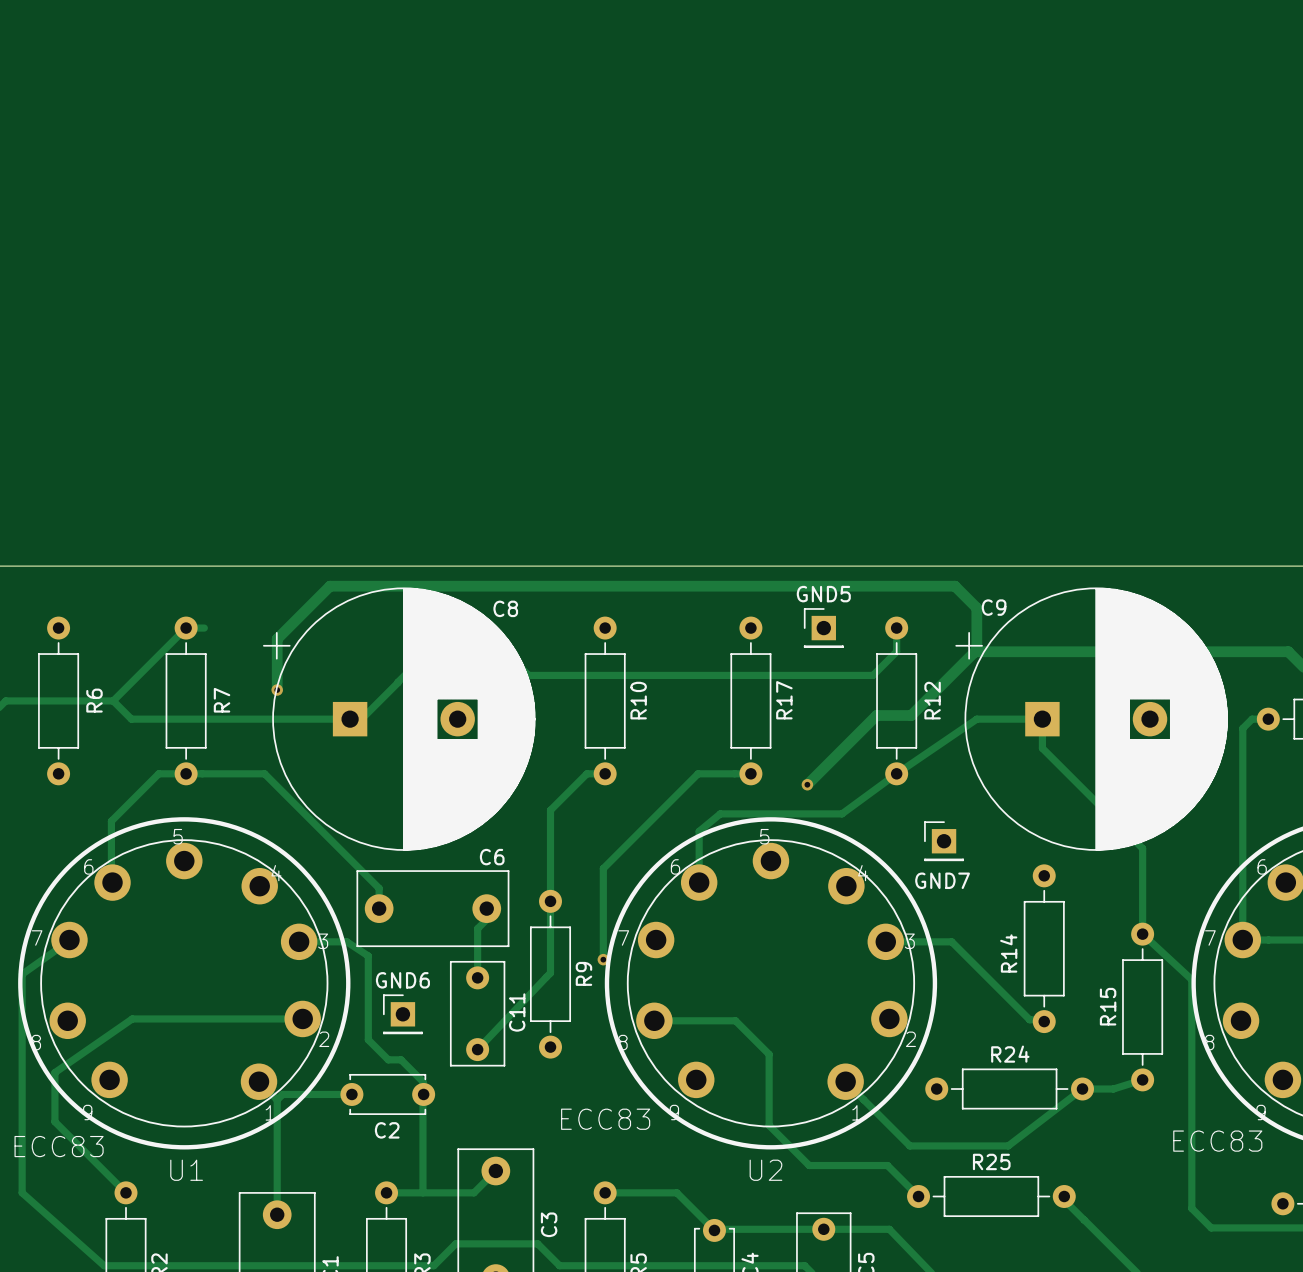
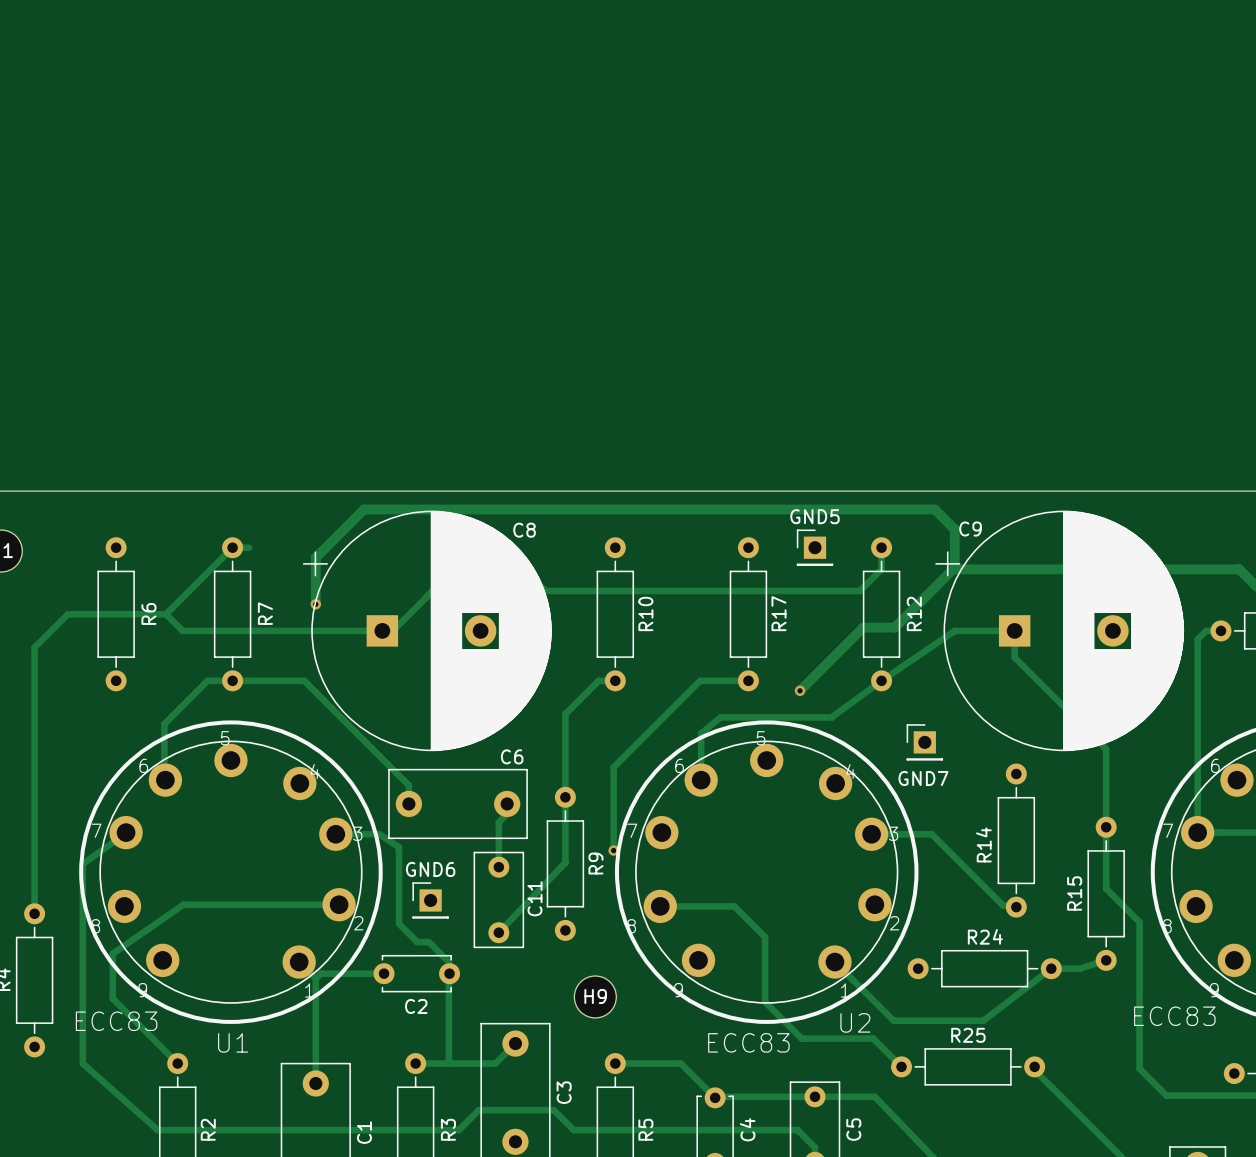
track: (1142, 934) (1191, 979) (1191, 1208) (1211, 1227) -> (1106, 827) (1106, 888) (1139, 922) (1139, 1068) (1166, 1095) (1168, 1095)
H9: none -> (595, 996)
U2 value position: ECC83 (605, 1119) -> ECC83 (748, 1042)
U2 name position: U2 (765, 1170) -> U2 (855, 1022)

